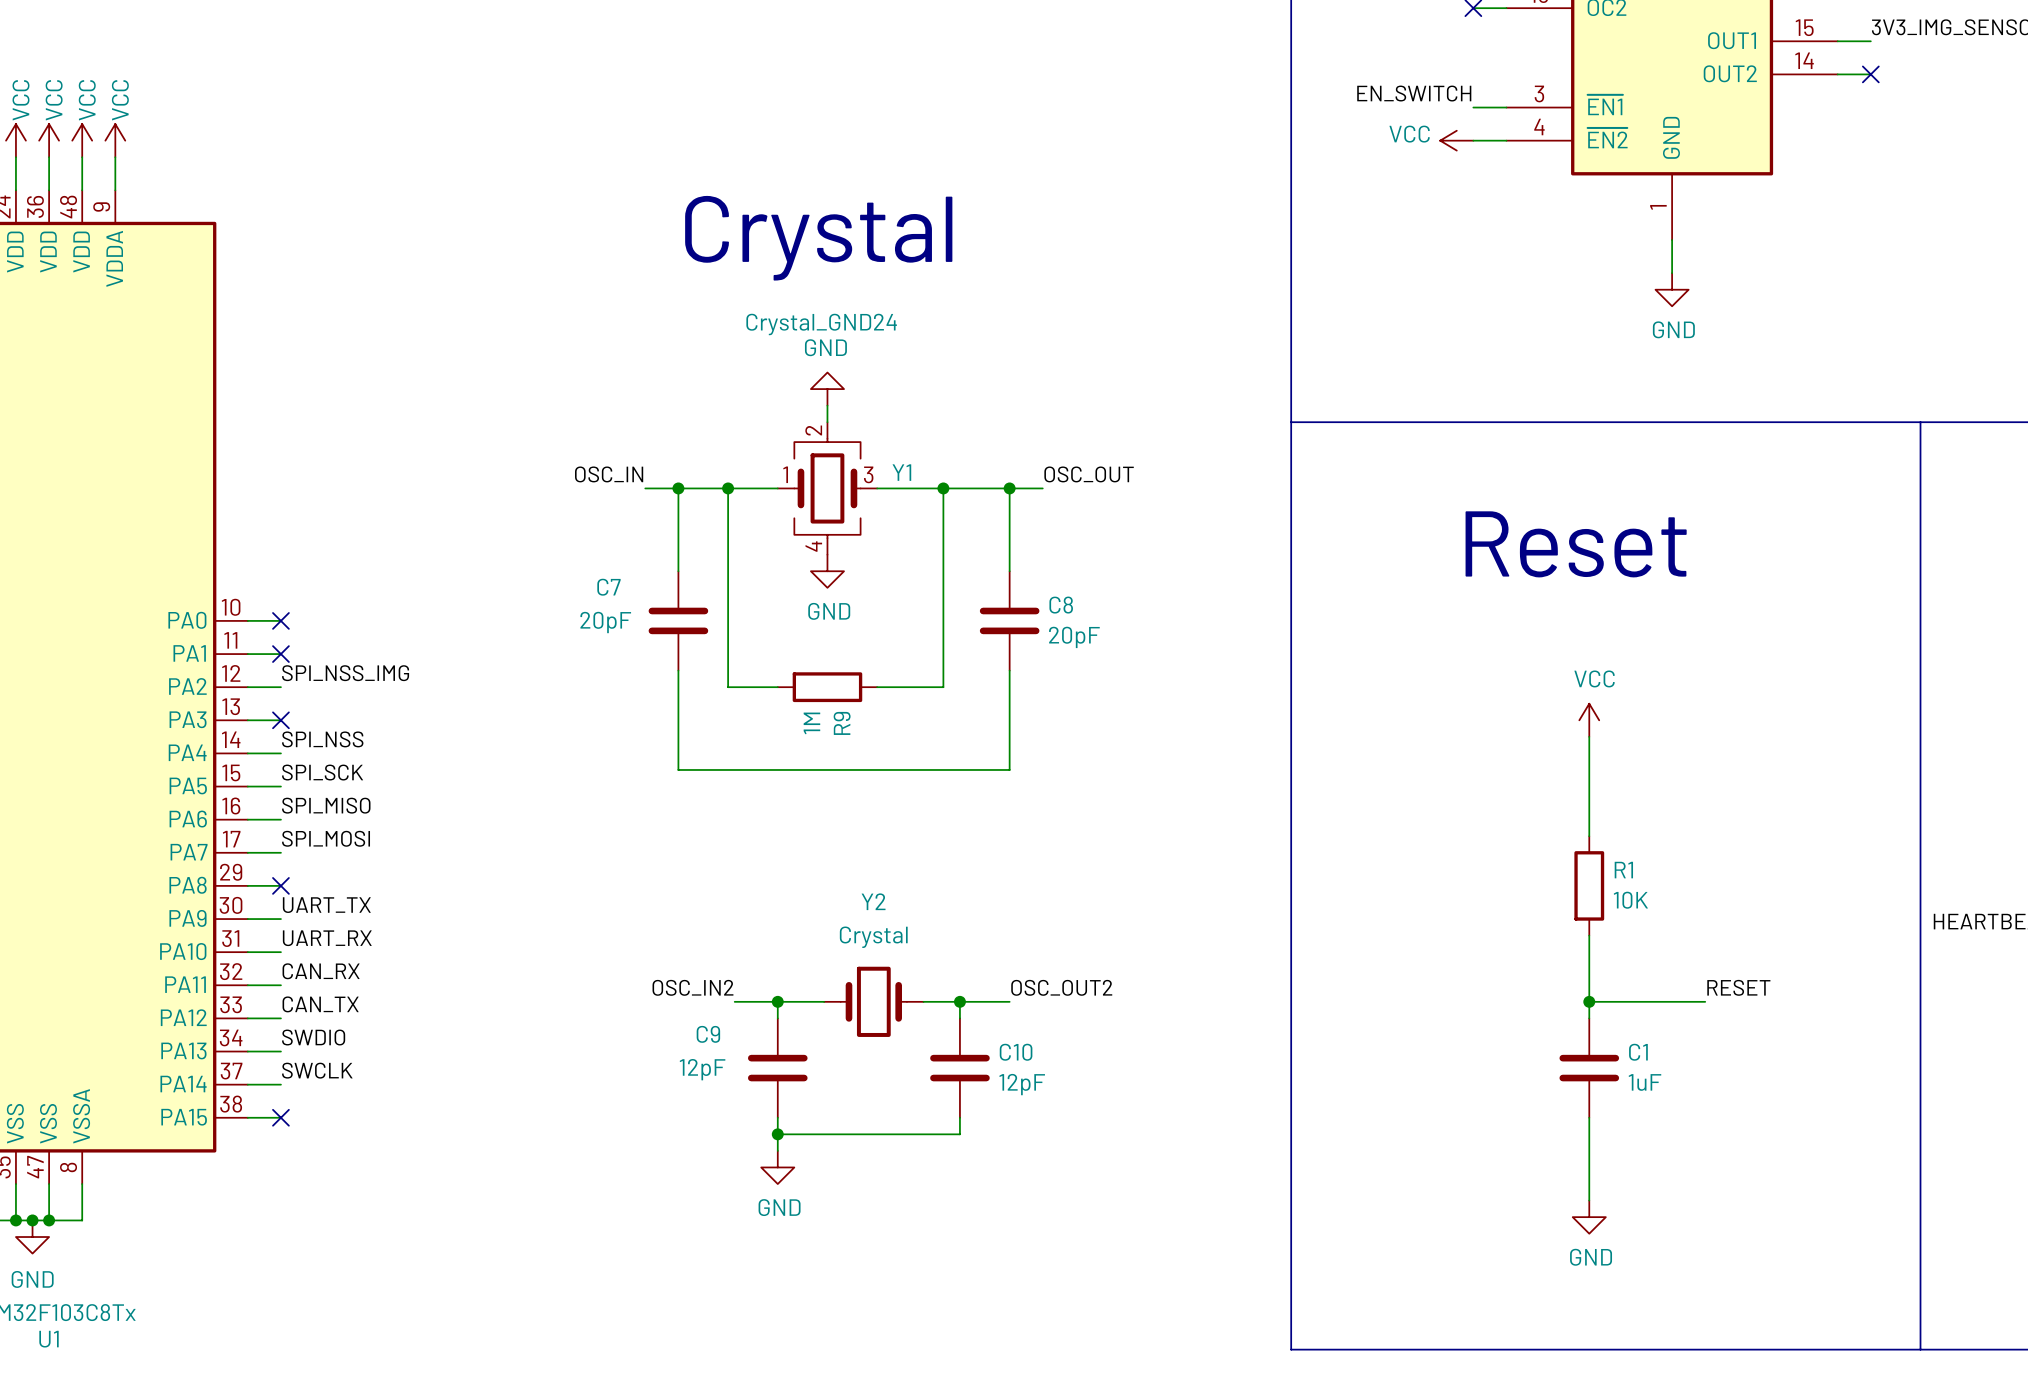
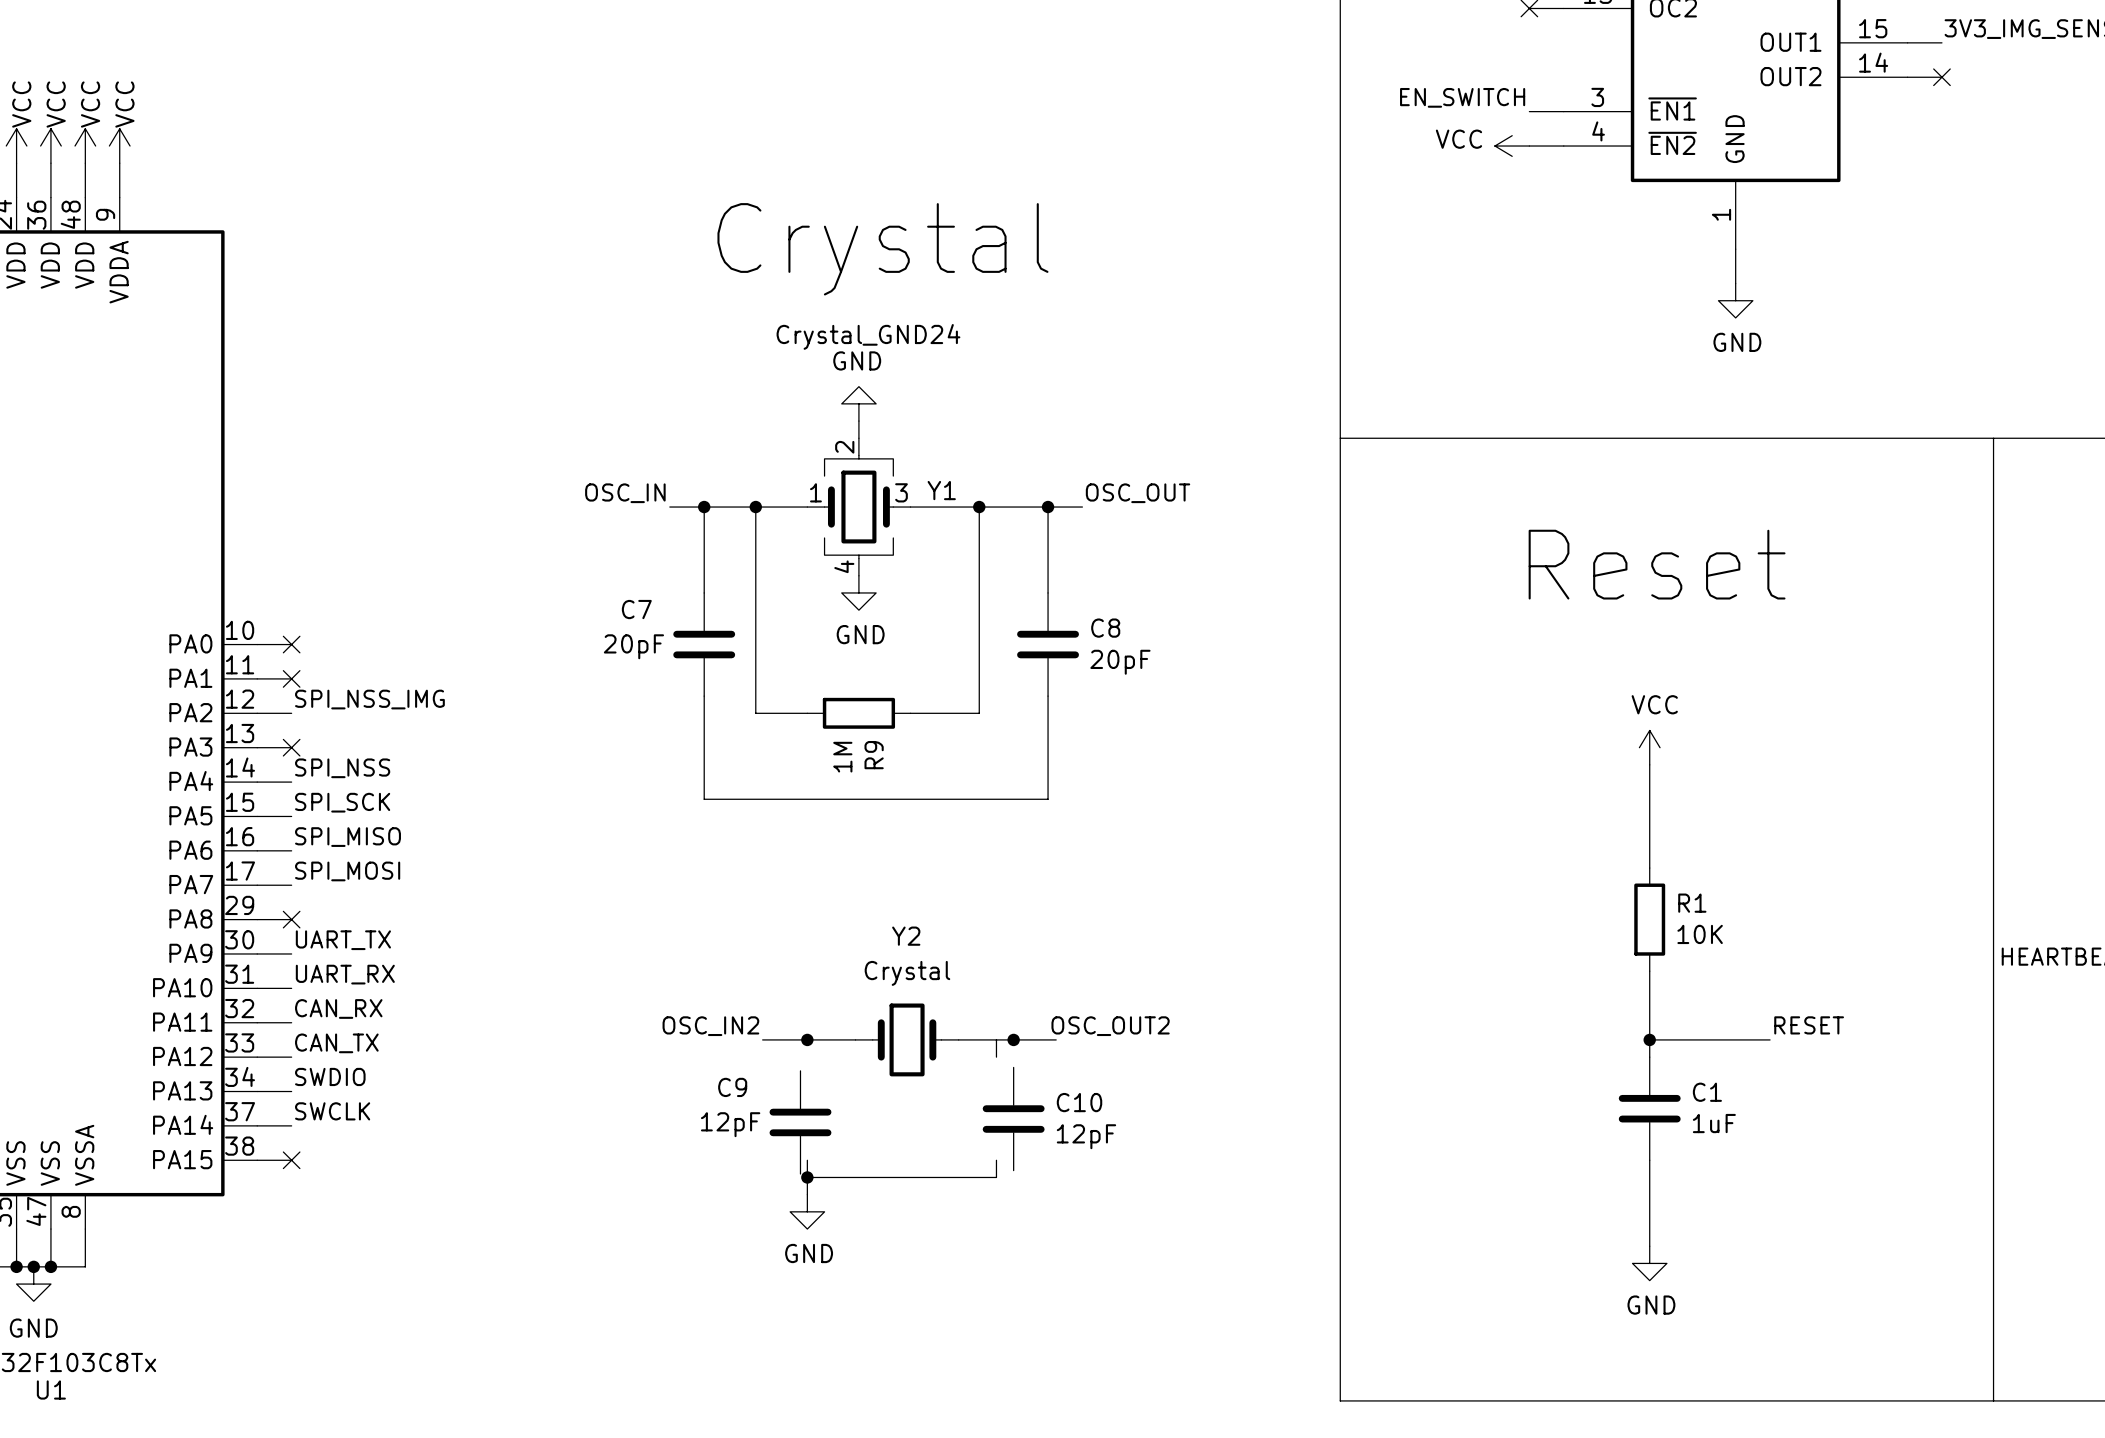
wire: (777, 1001) (777, 1018) -> none
junction position: (959, 1001) -> (1013, 1039)
wire: none -> (1048, 1039) (1056, 1039)
C9 position: (777, 1068) -> (800, 1122)
C10 position: (959, 1068) -> (1013, 1119)

